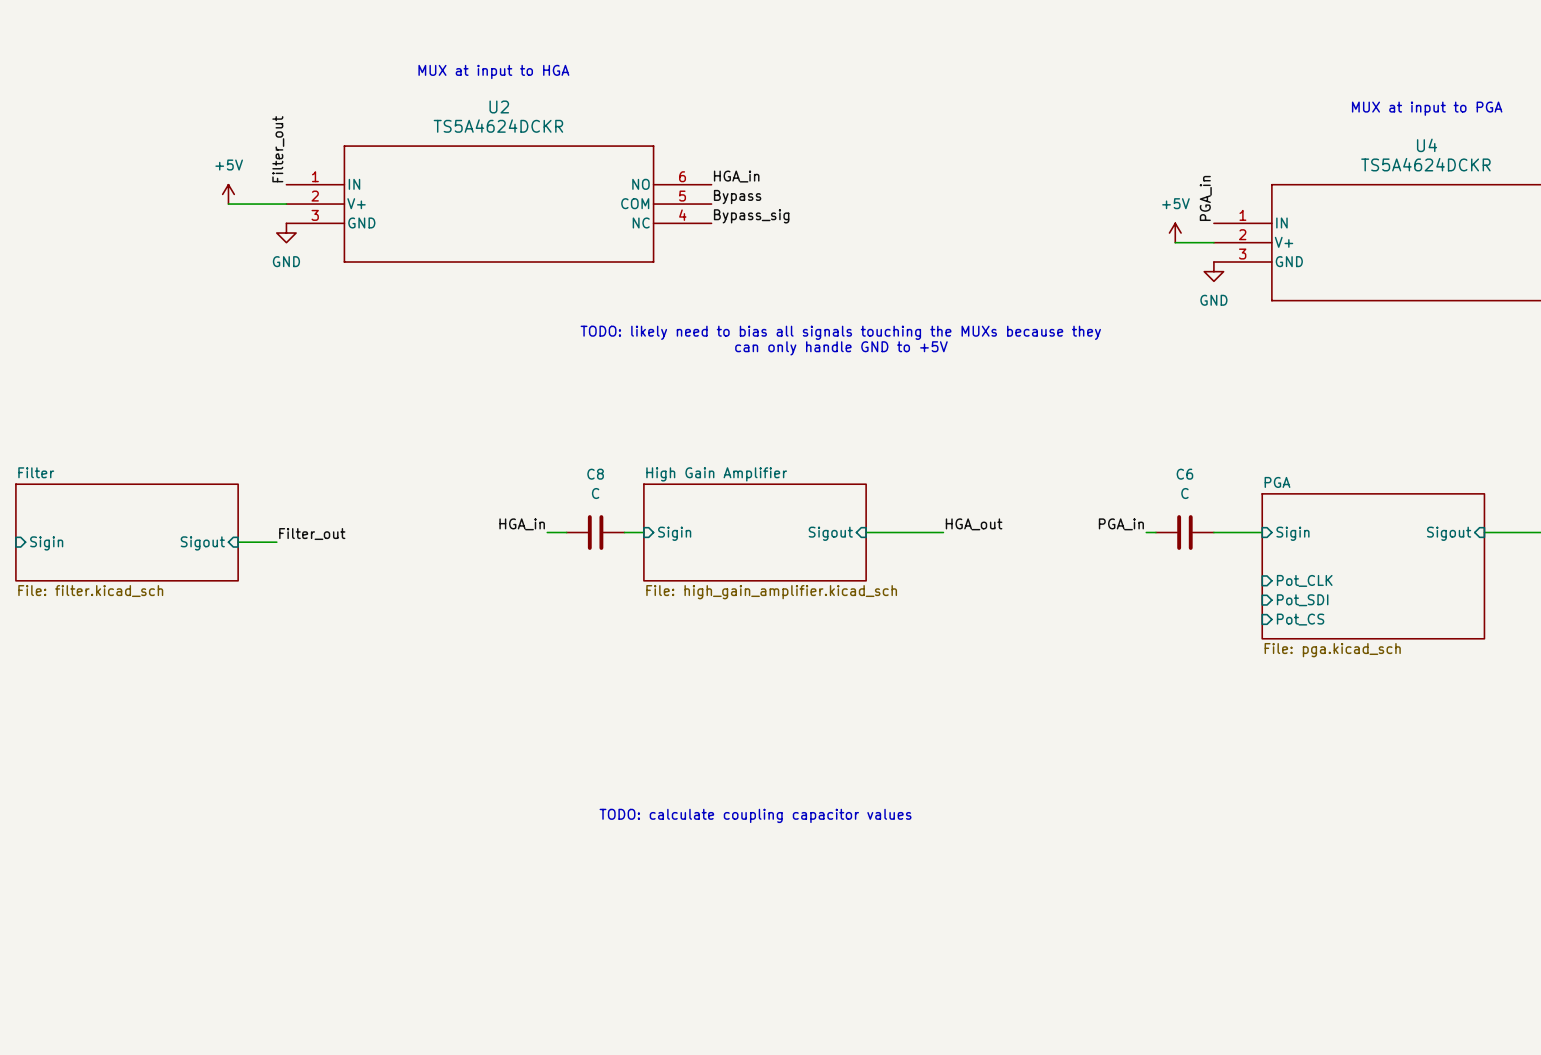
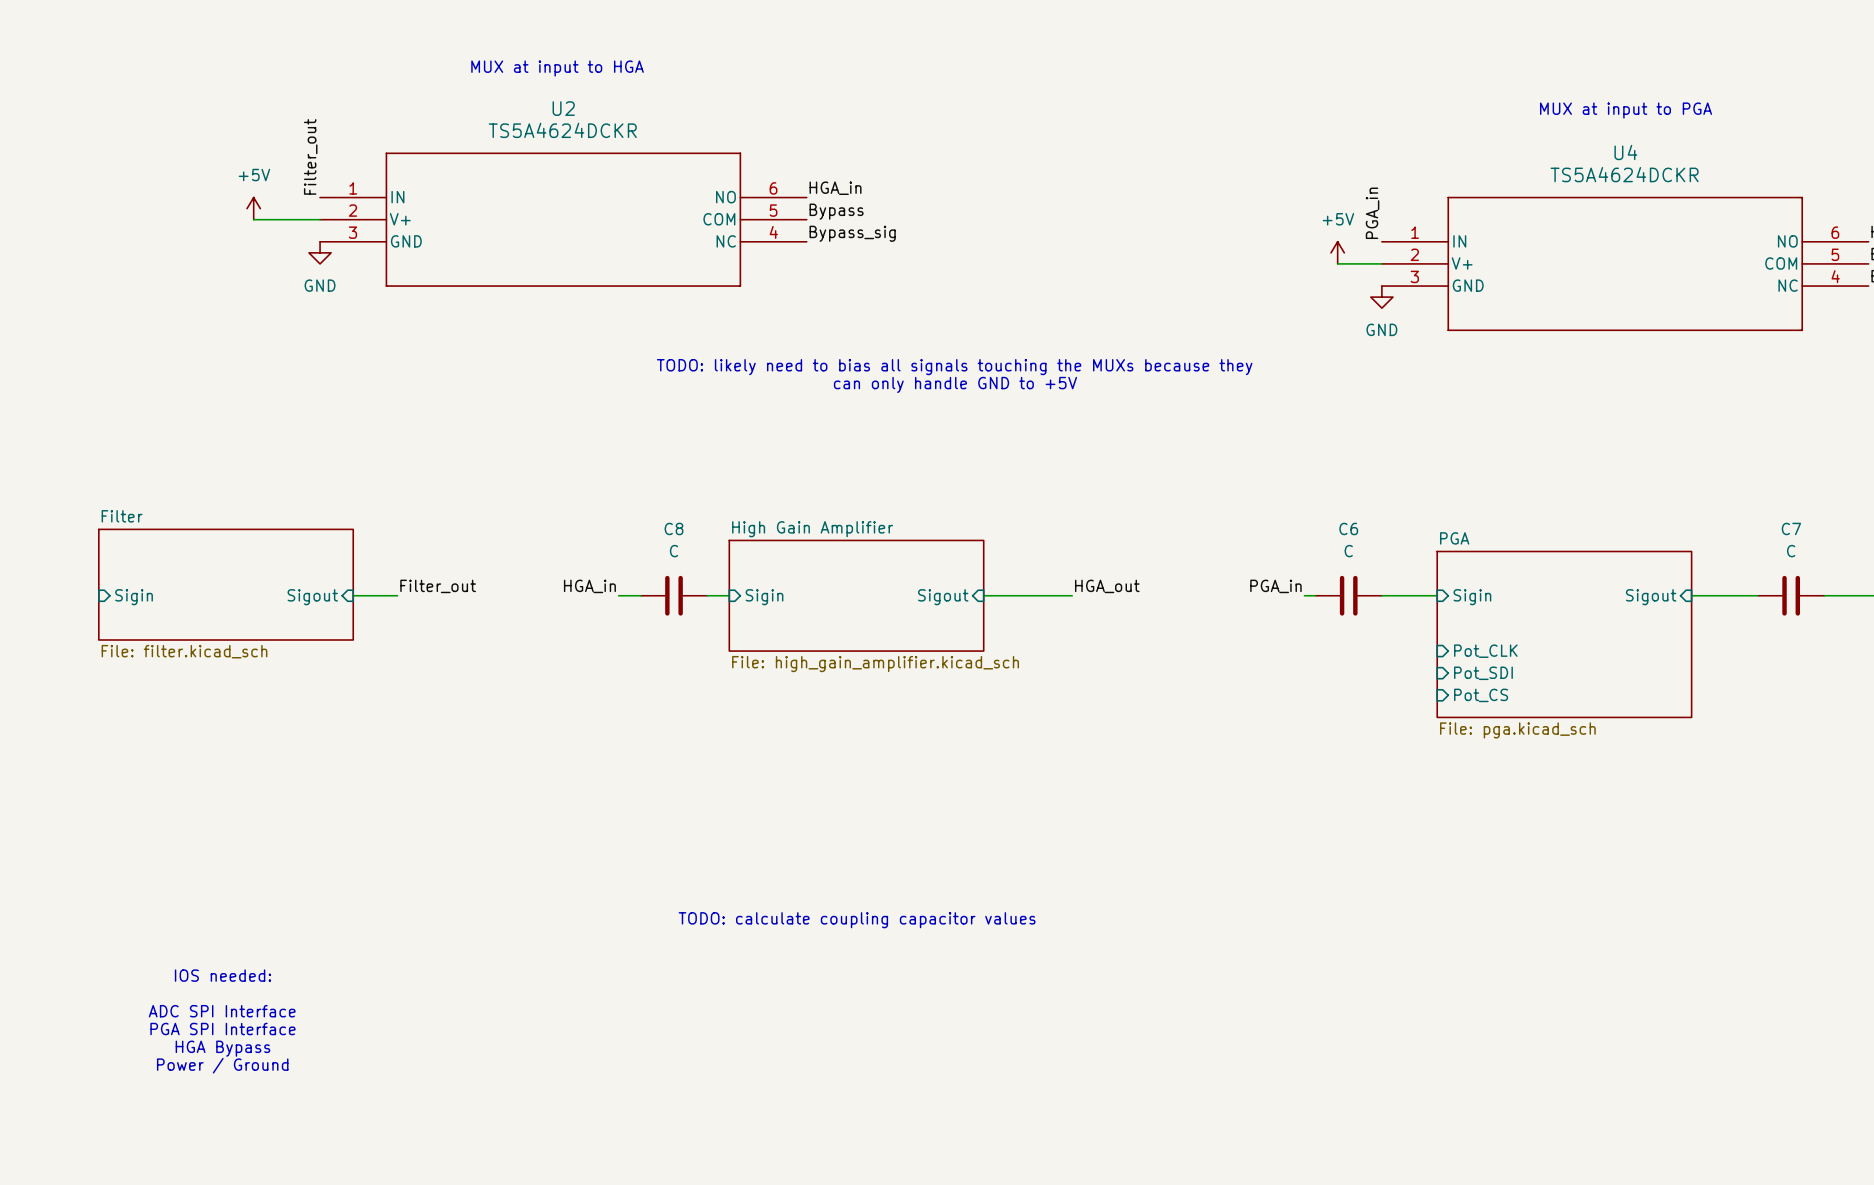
sheet Filter position: (127, 532) -> (226, 584)
label position: Filter_out (312, 534) -> Filter_out (438, 586)
wire: (238, 542) (276, 542) -> (353, 595) (397, 595)
sheet pin position: Sigin (46, 543) -> Sigin (134, 597)
sheet pin position: Sigout (202, 543) -> Sigout (312, 597)
text: none -> IOS needed: (222, 975)
text: none -> ADC SPI Interface (222, 1011)
text: none -> PGA SPI Interface (222, 1029)
text: none -> HGA Bypass (222, 1048)
text: none -> Power / Ground (222, 1065)

